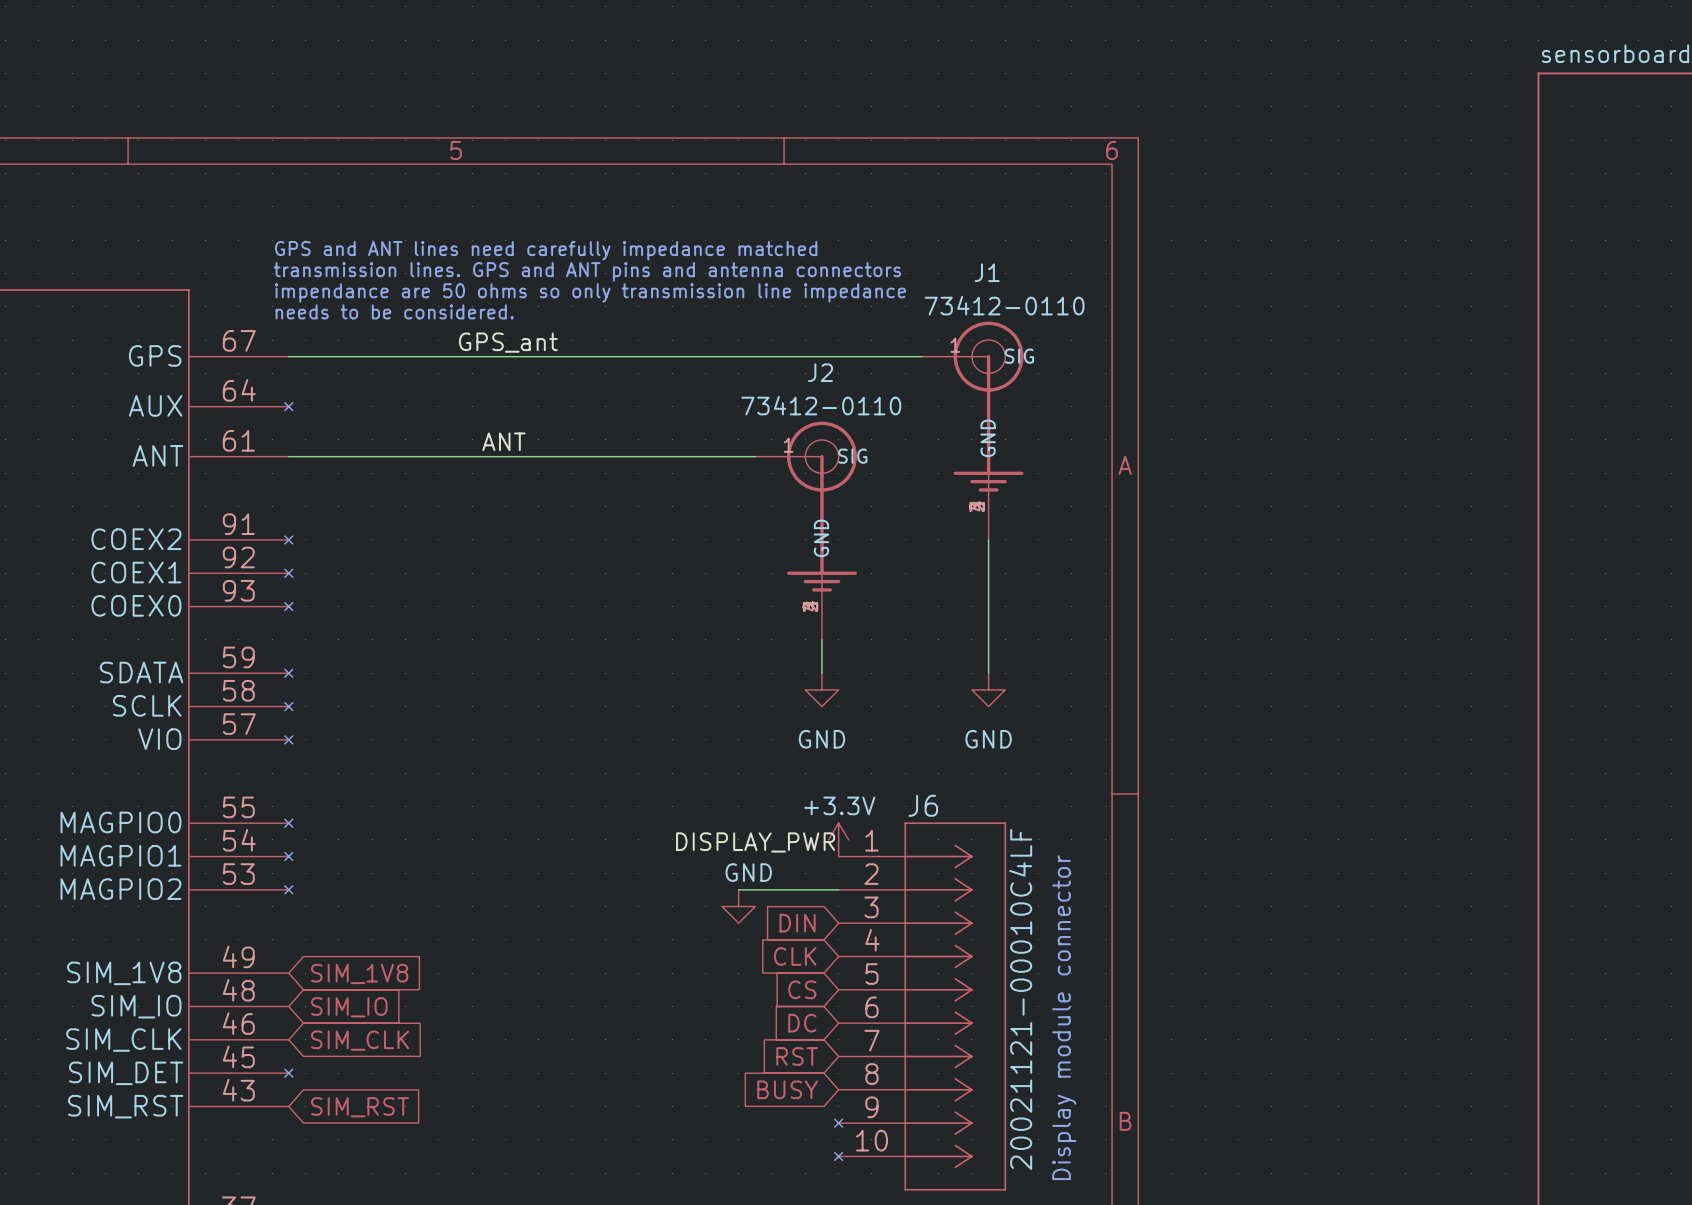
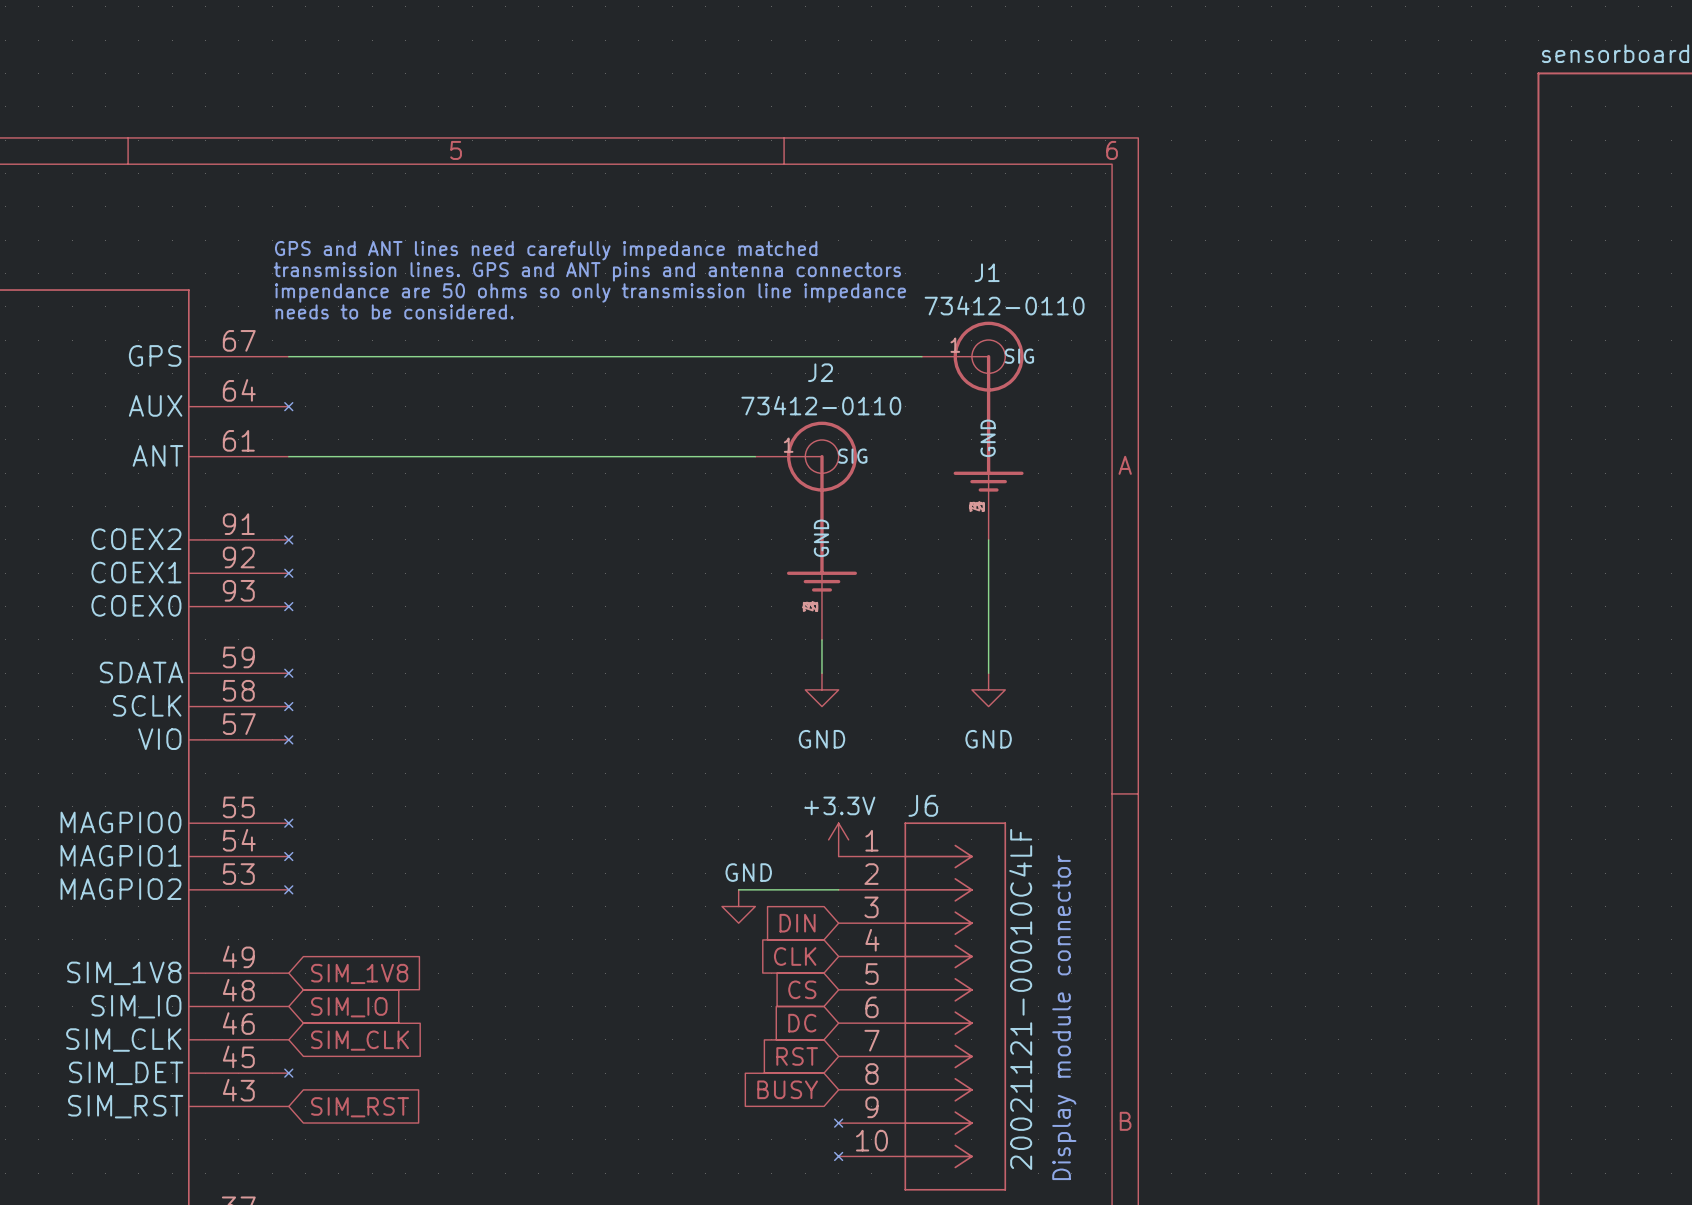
label: GPS_ant (508, 342) -> none
label: ANT (503, 441) -> none
label: DISPLAY_PWR (755, 842) -> none

